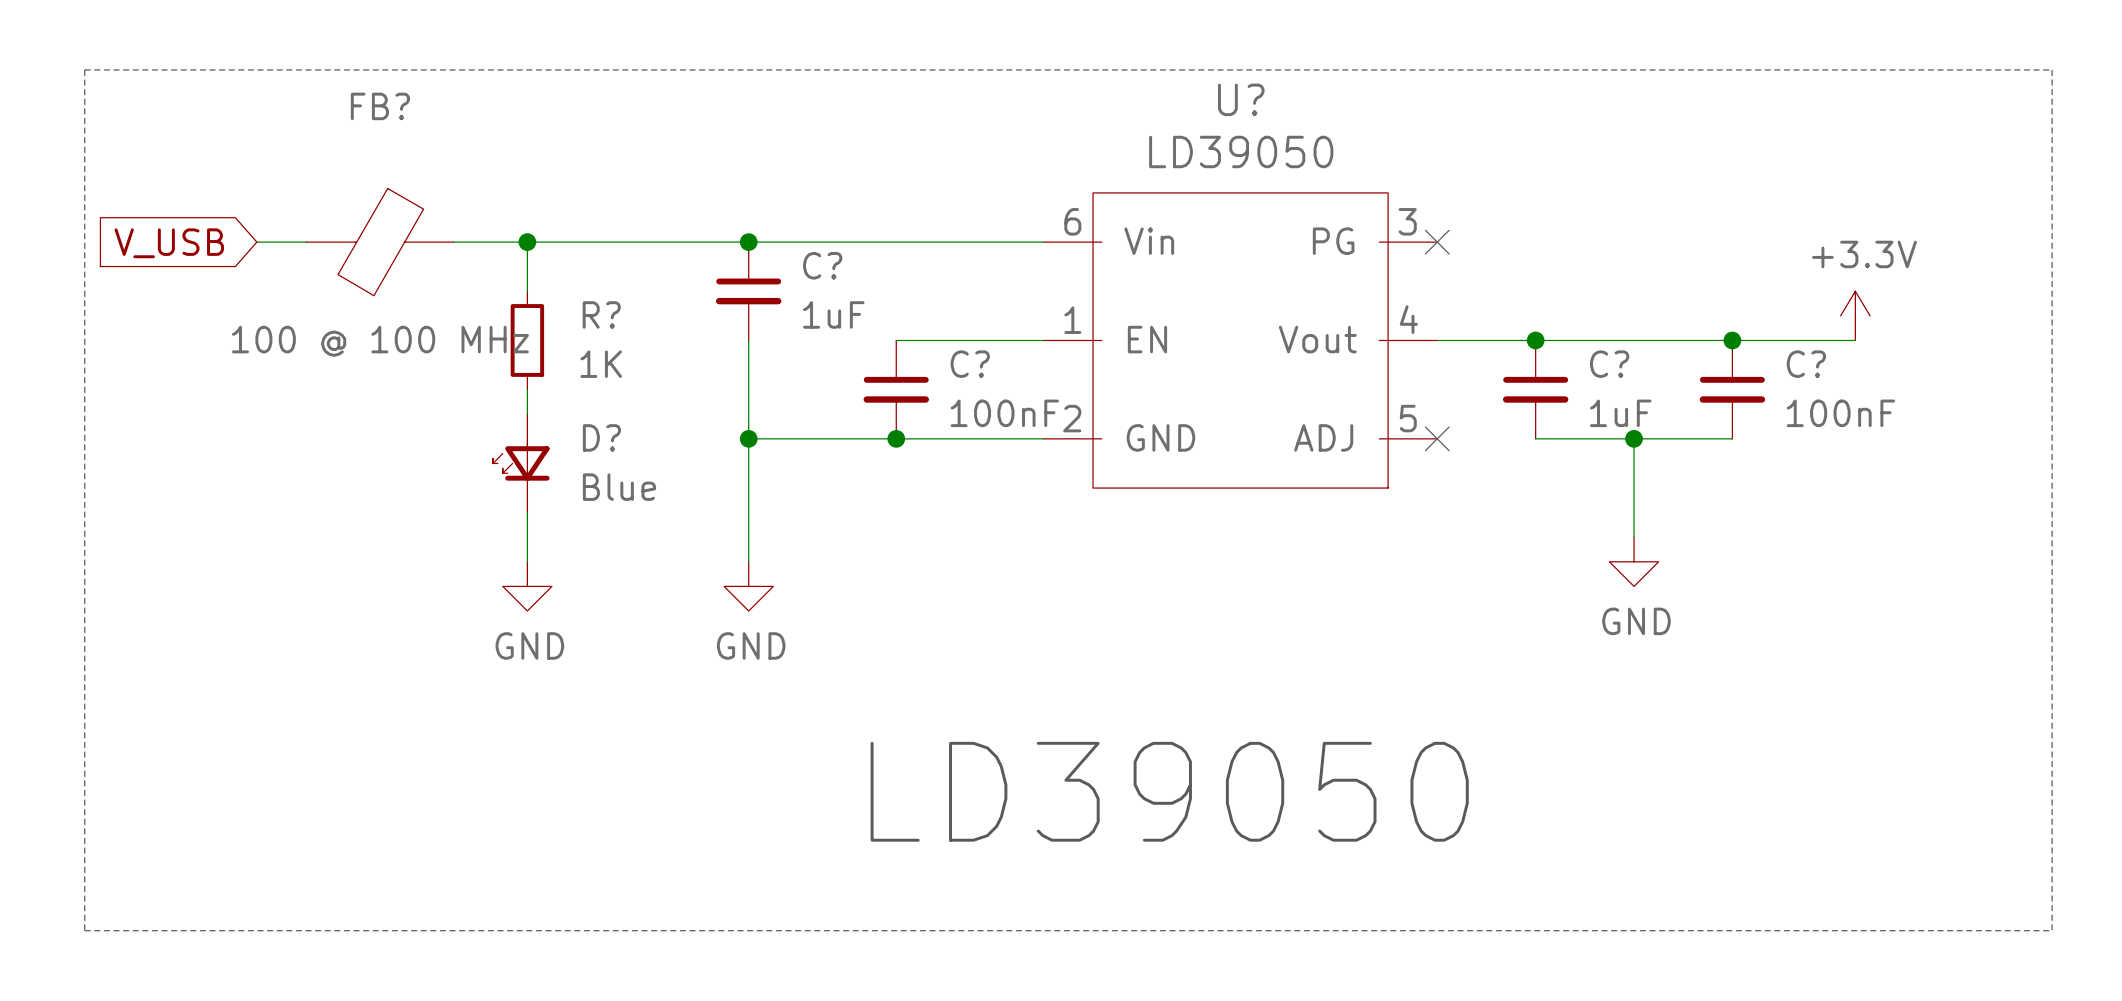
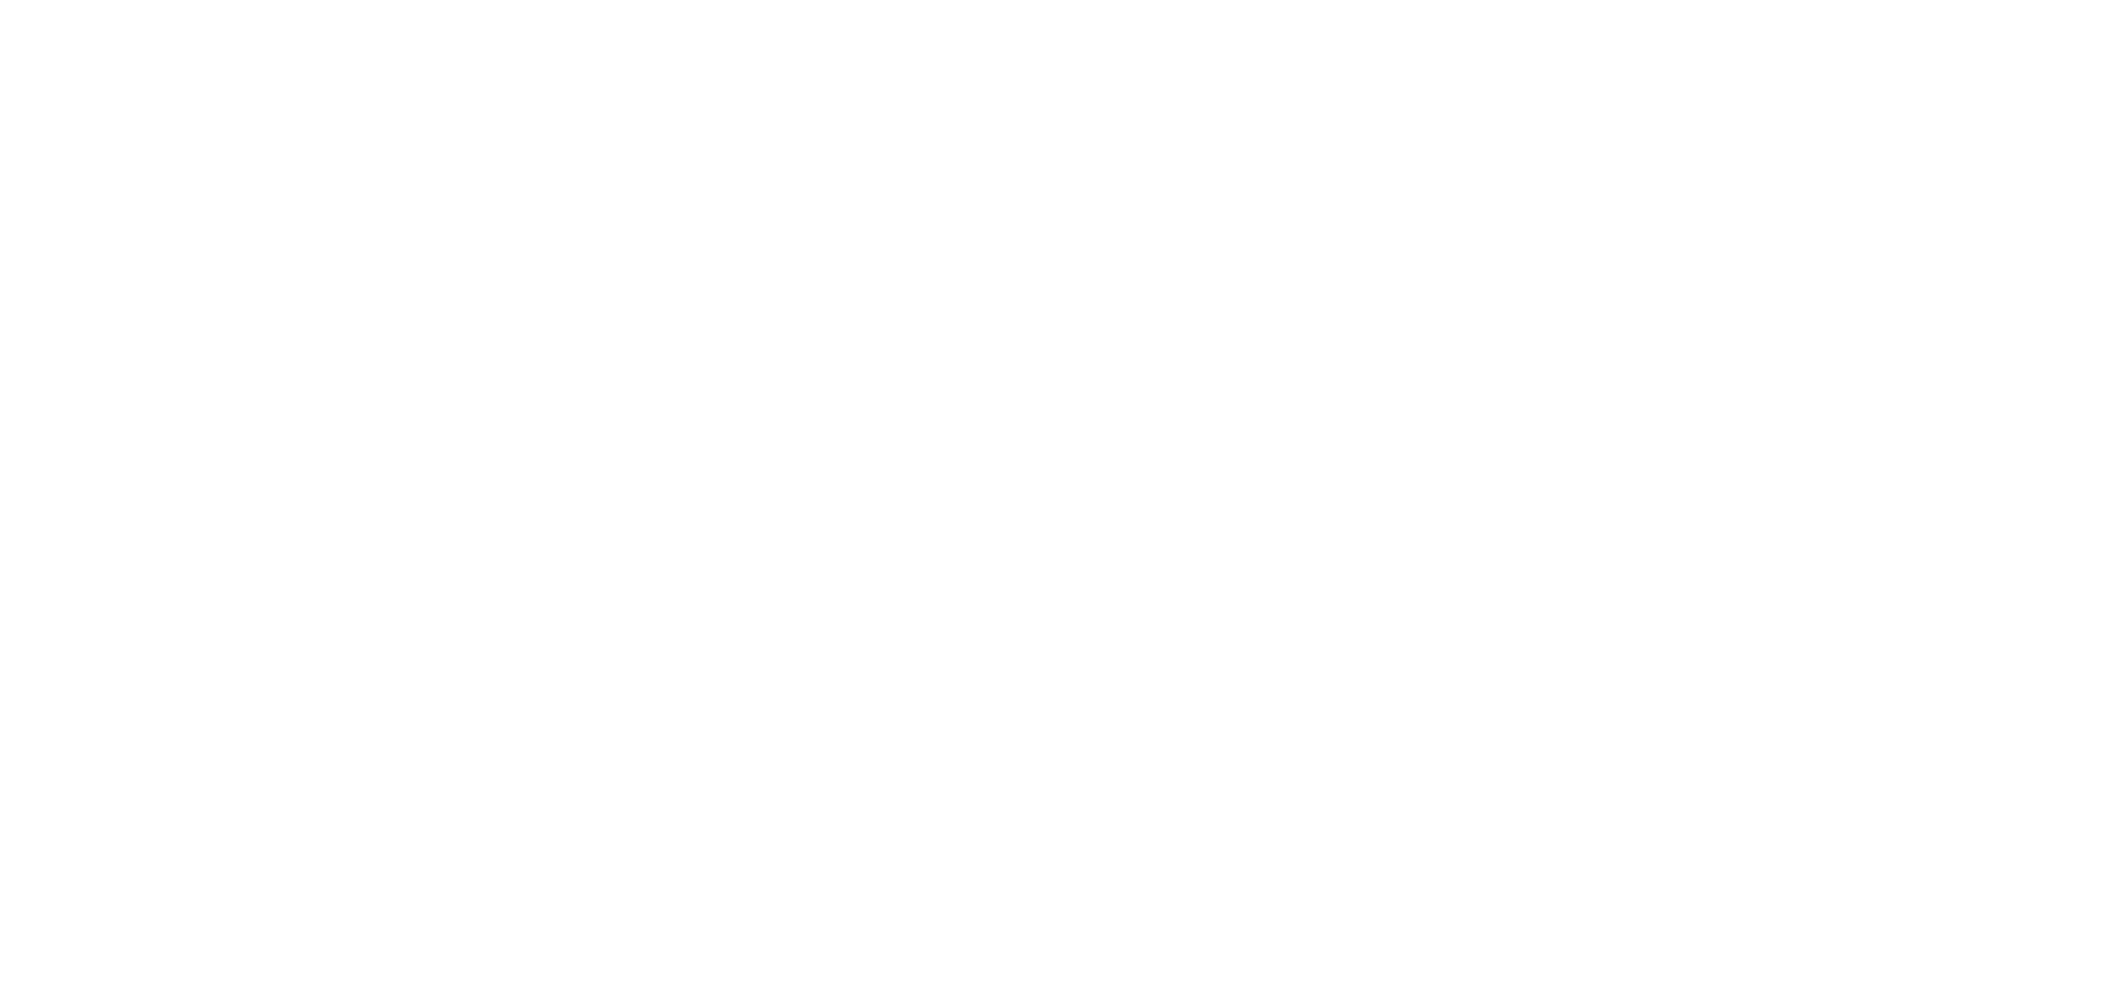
line: (84, 69) (2052, 69) (2052, 930) (84, 930) (84, 69) -> none
wire: (256, 242) (306, 242) -> none
FB?: 100 @ 100 MHz (379, 242) -> none
wire: (453, 242) (1043, 242) -> none
wire: (527, 242) (527, 291) -> none
junction: (527, 242) -> none
junction: (748, 242) -> none
no-connect mark: (1437, 242) -> none
global label: V_USB (169, 243) -> none
C?: 1uF (748, 291) -> none
power symbol: +3.3V (1855, 315) -> none
R?: 1K (527, 340) -> none
wire: (748, 340) (748, 561) -> none
wire: (896, 340) (1043, 340) -> none
U?: LD39050 (1240, 340) -> none
wire: (1437, 340) (1855, 340) -> none
junction: (1535, 340) -> none
junction: (1732, 340) -> none
wire: (527, 389) (527, 414) -> none
C?: 100nF (896, 389) -> none
C?: 1uF (1535, 389) -> none
C?: 100nF (1732, 389) -> none
wire: (748, 438) (1043, 438) -> none
junction: (748, 438) -> none
junction: (896, 438) -> none
no-connect mark: (1437, 438) -> none
wire: (1535, 438) (1732, 438) -> none
wire: (1634, 438) (1634, 537) -> none
junction: (1634, 438) -> none
D?: Blue (521, 463) -> none
wire: (527, 512) (527, 561) -> none
power symbol: GND (1634, 561) -> none
power symbol: GND (527, 586) -> none
power symbol: GND (748, 586) -> none
text: LD39050 (1169, 791) -> none

